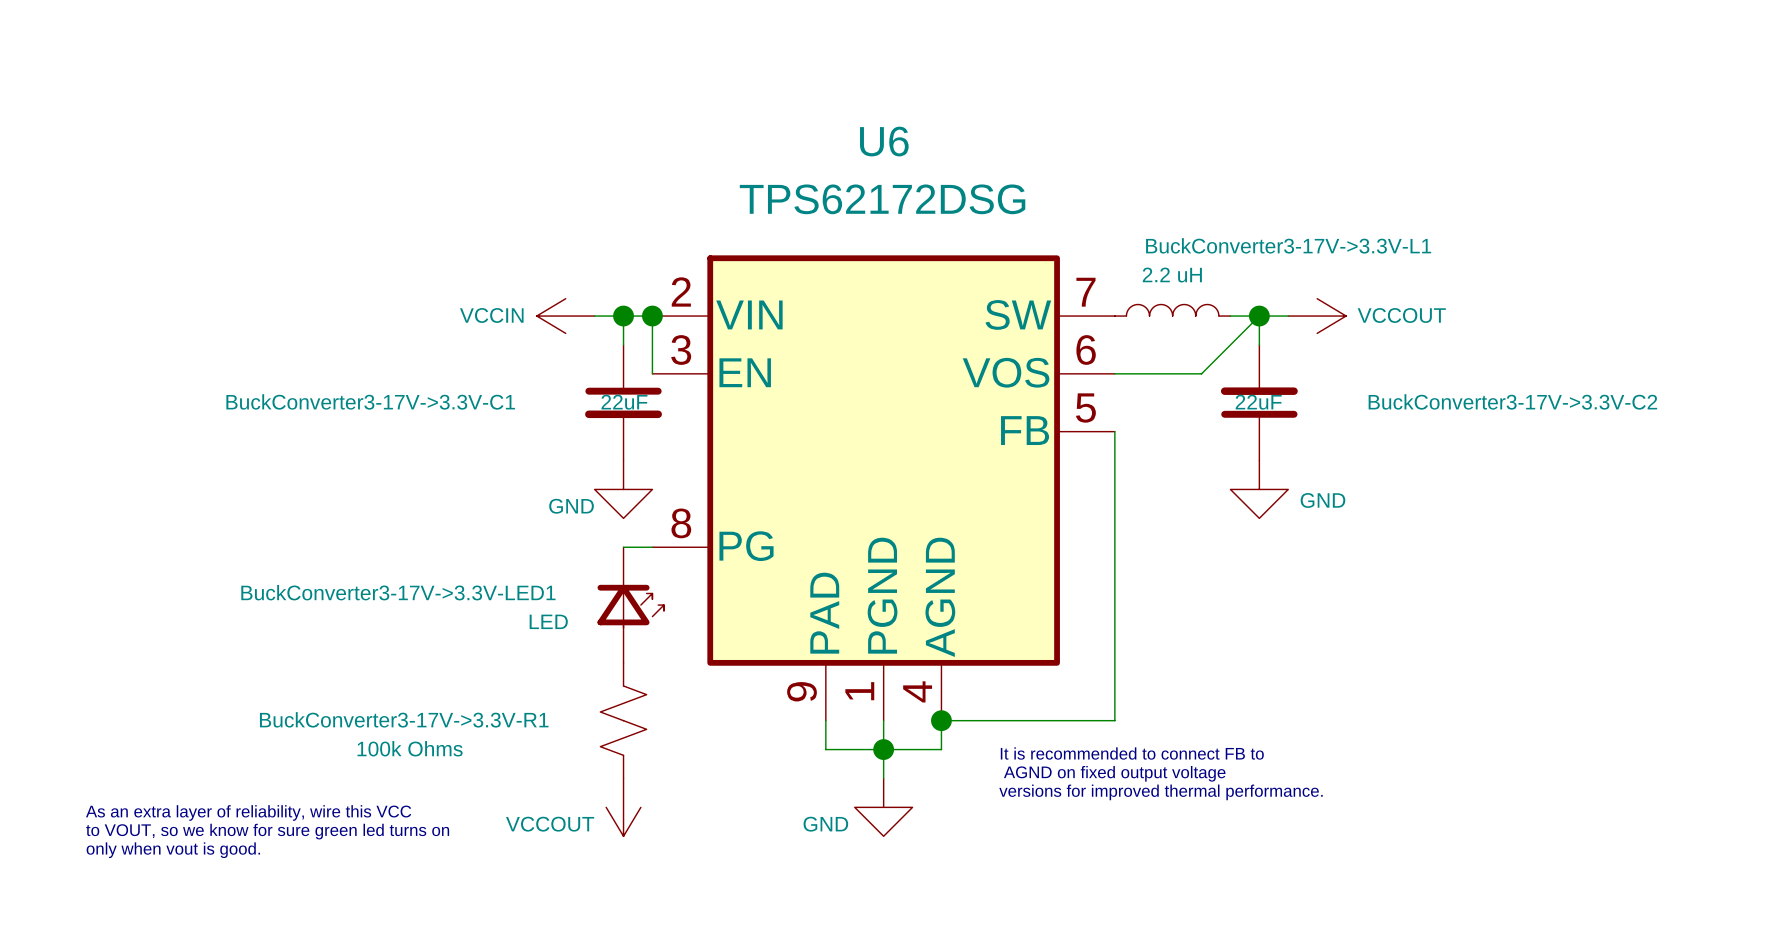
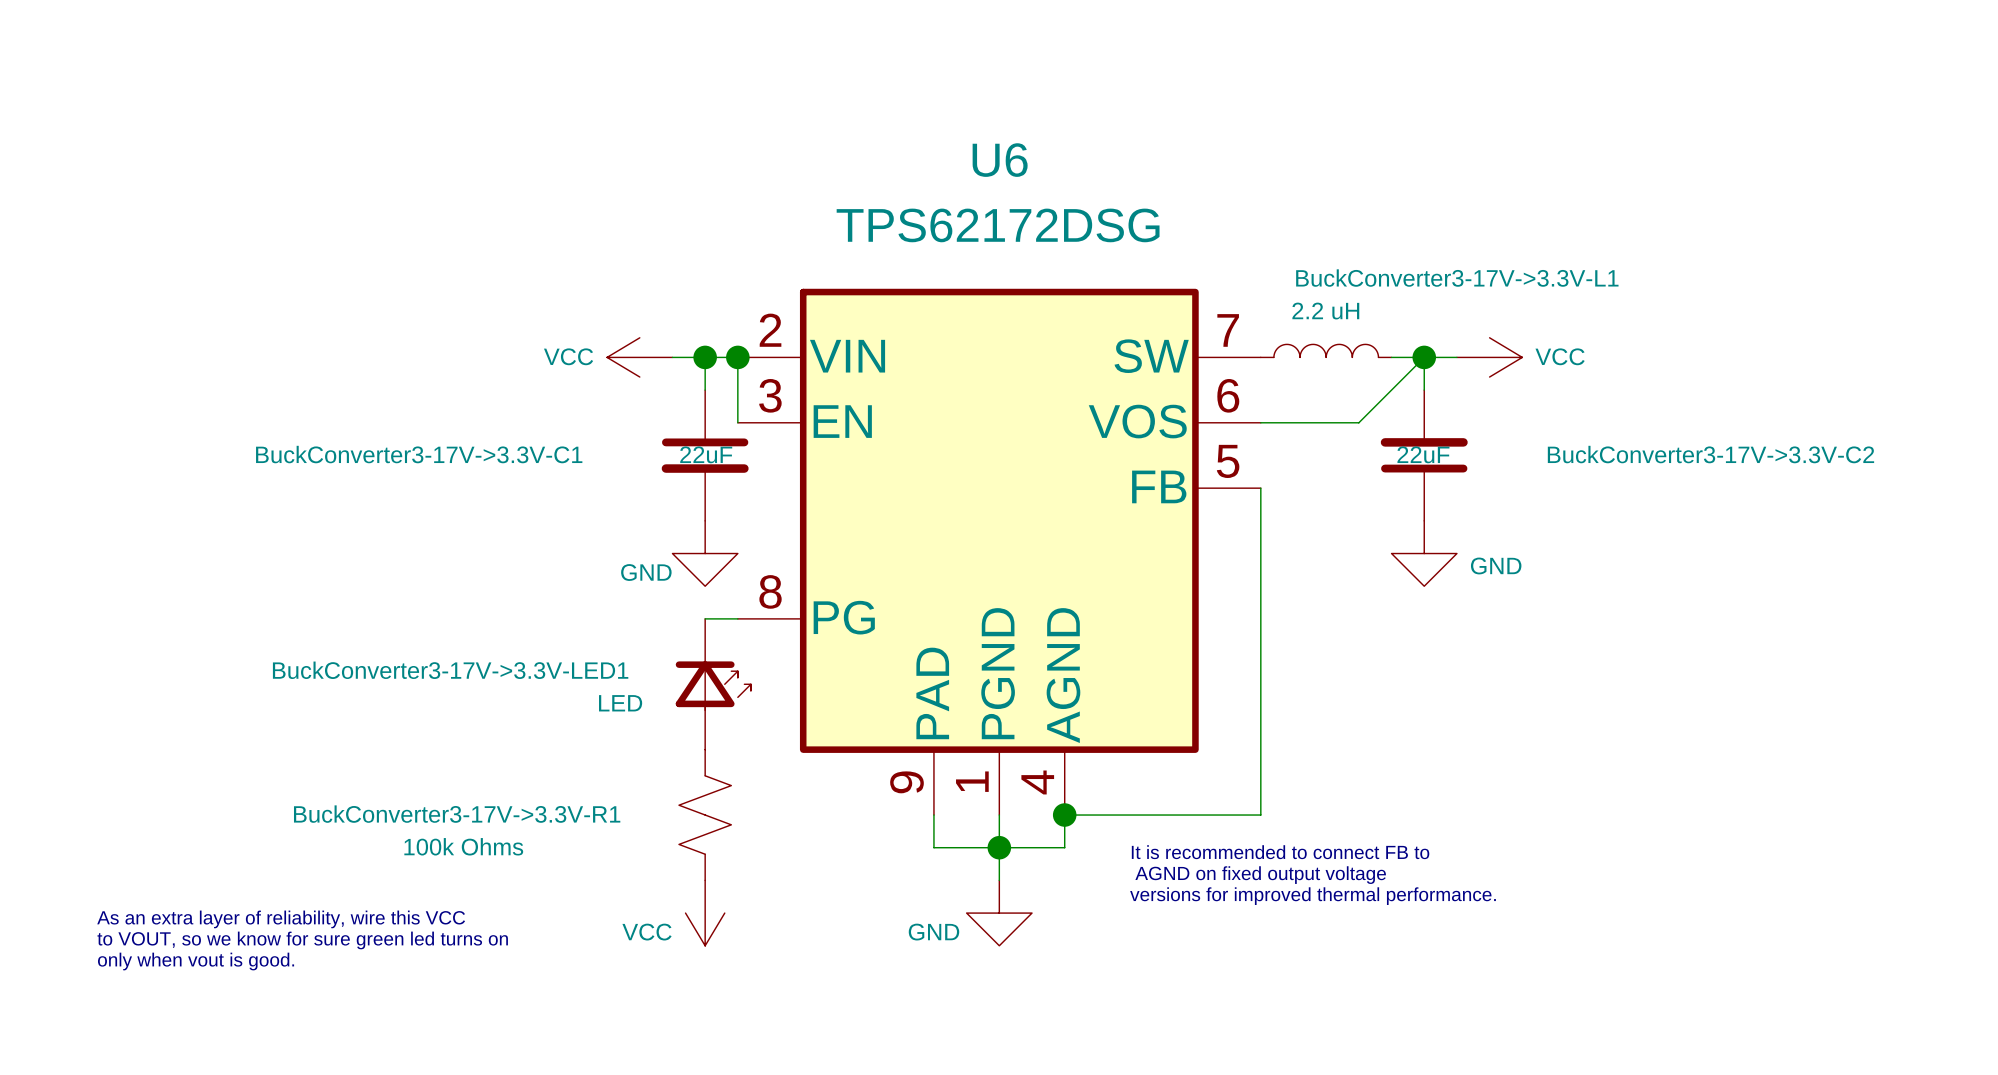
power symbol: VCCIN (565, 316) -> VCC (639, 357)
power symbol: VCCOUT (1317, 316) -> VCC (1489, 357)
power symbol: VCCOUT (623, 807) -> VCC (705, 913)

